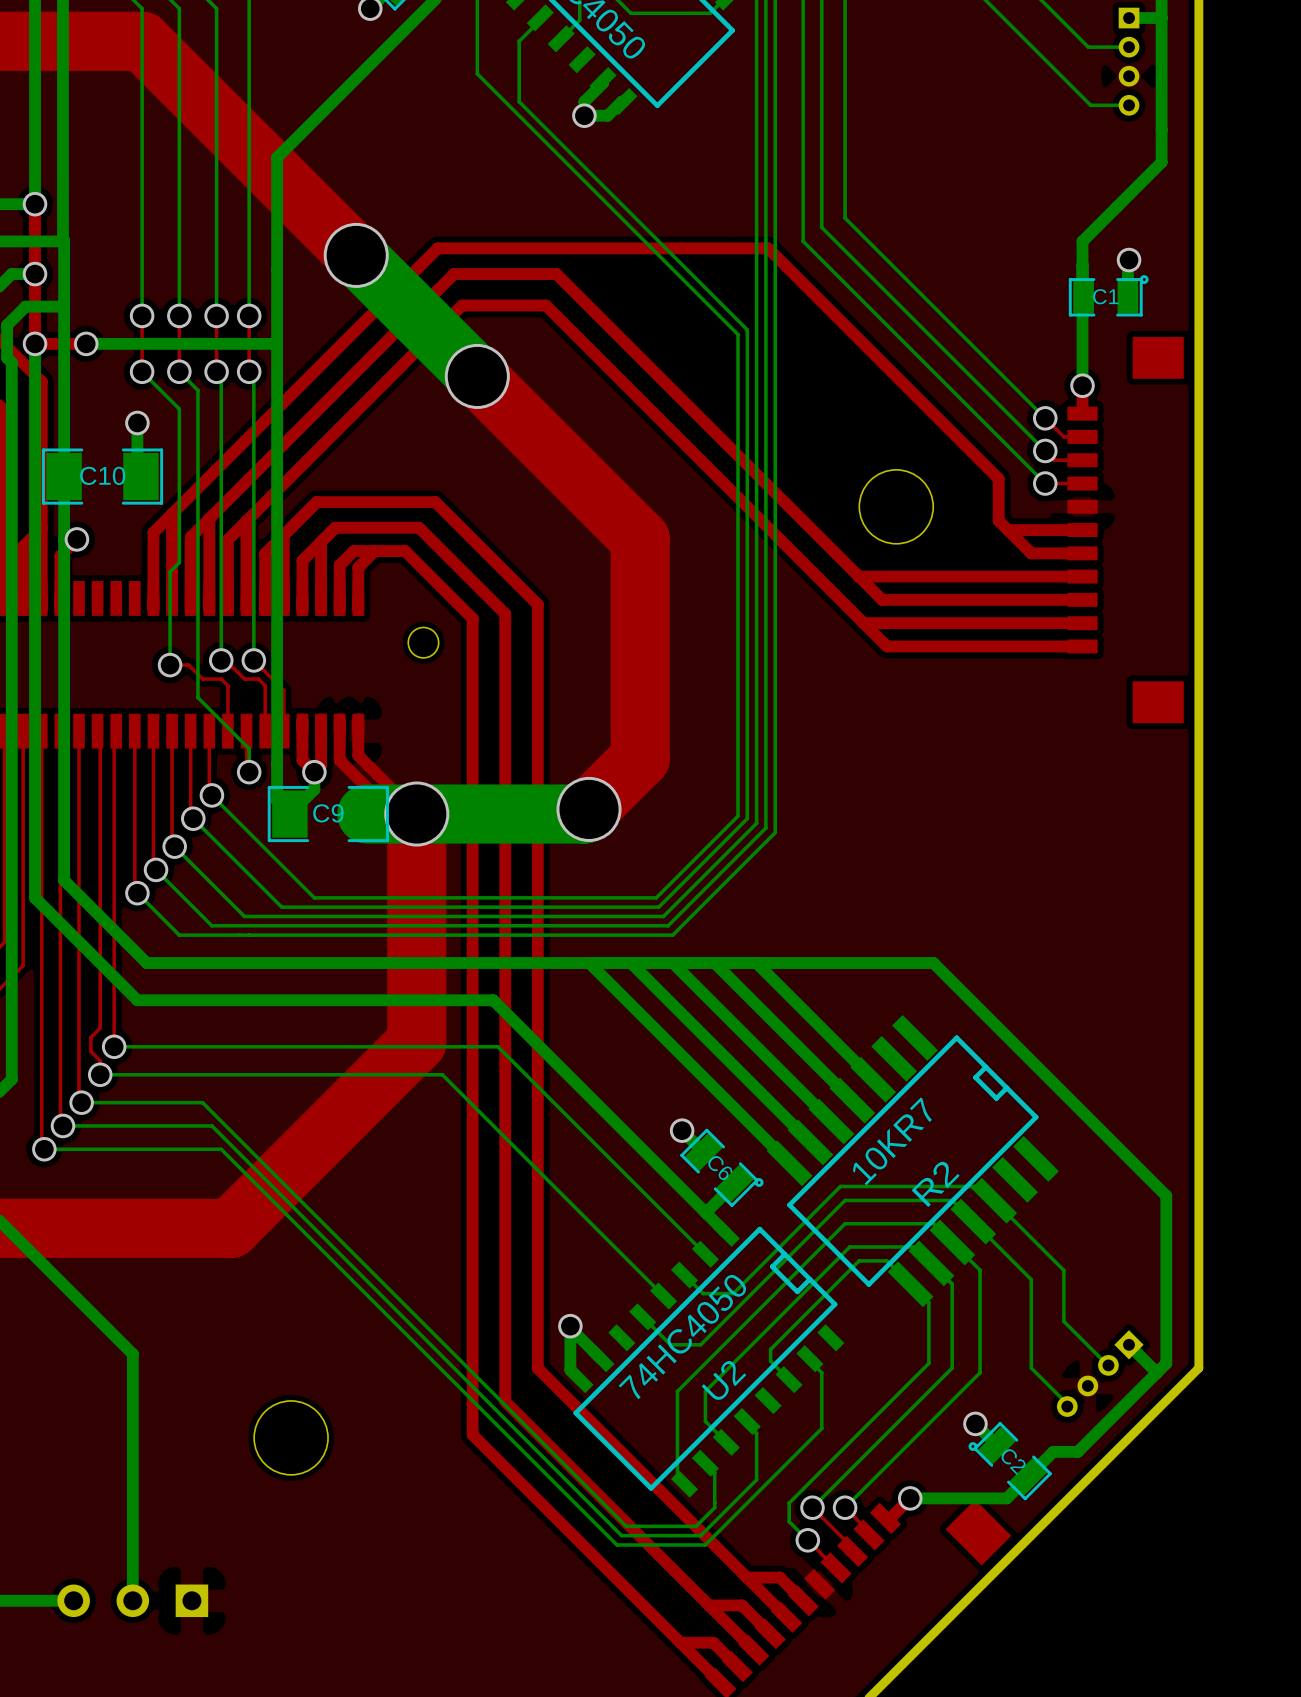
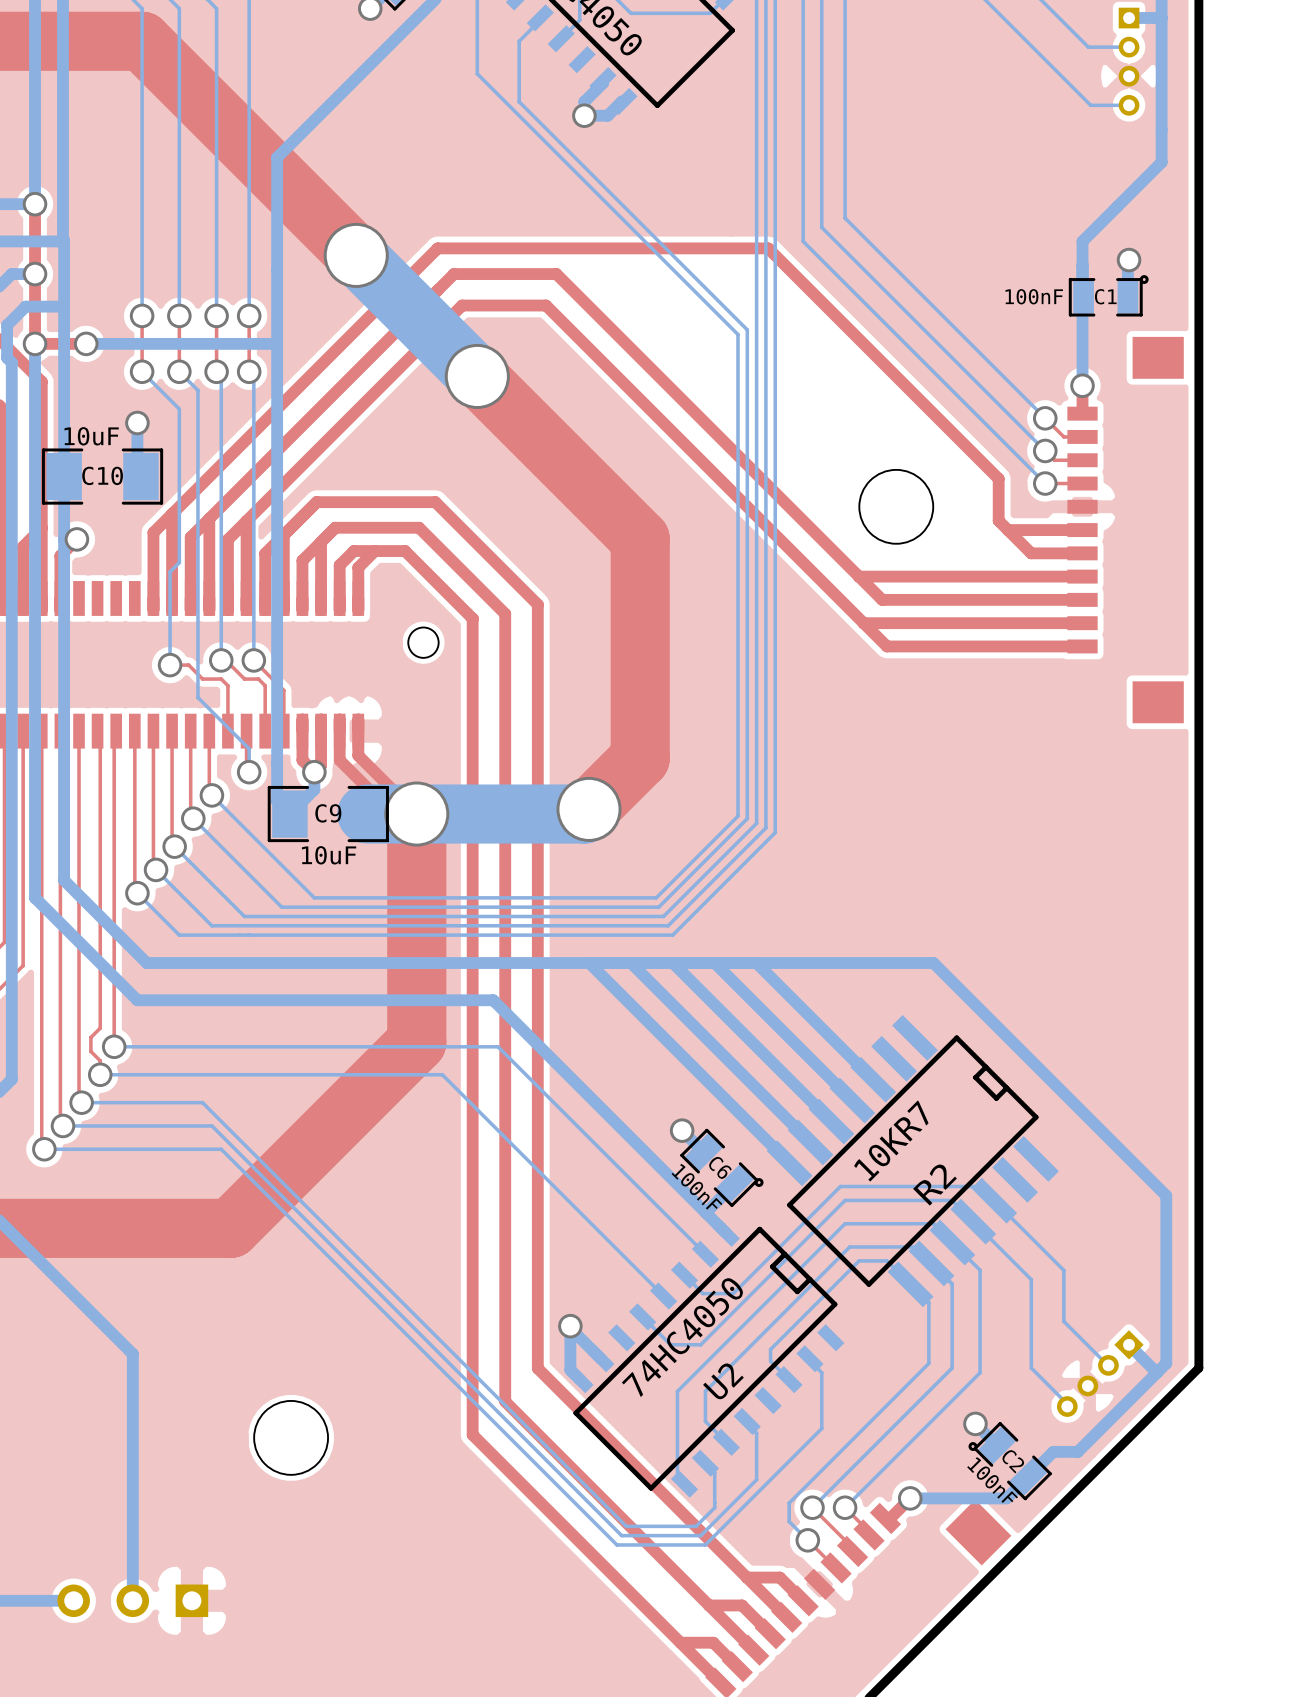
C1 value: none -> 100nF (1034, 296)
C10 value: none -> 10uF (91, 436)
C9 value: none -> 10uF (329, 855)
C6 value: none -> 100nF (697, 1186)
C2 value: none -> 100nF (992, 1480)

